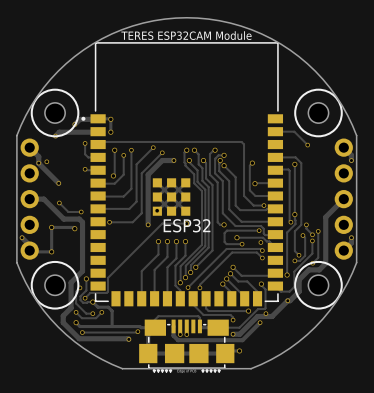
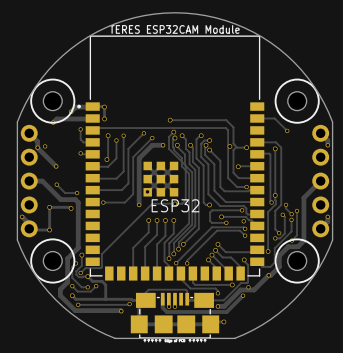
track: none -> (170, 120) (226, 120) (233, 127) (234, 144) (237, 147) (246, 147)
via: none -> (170, 120)
track: none -> (173, 132) (169, 136) (169, 148) (185, 165) (185, 200) (182, 203) (174, 203)
via: none -> (173, 132)
via: (186, 150) -> none
via: none -> (174, 138)
via: none -> (229, 146)
via: (252, 163) -> none
via: none -> (246, 147)

